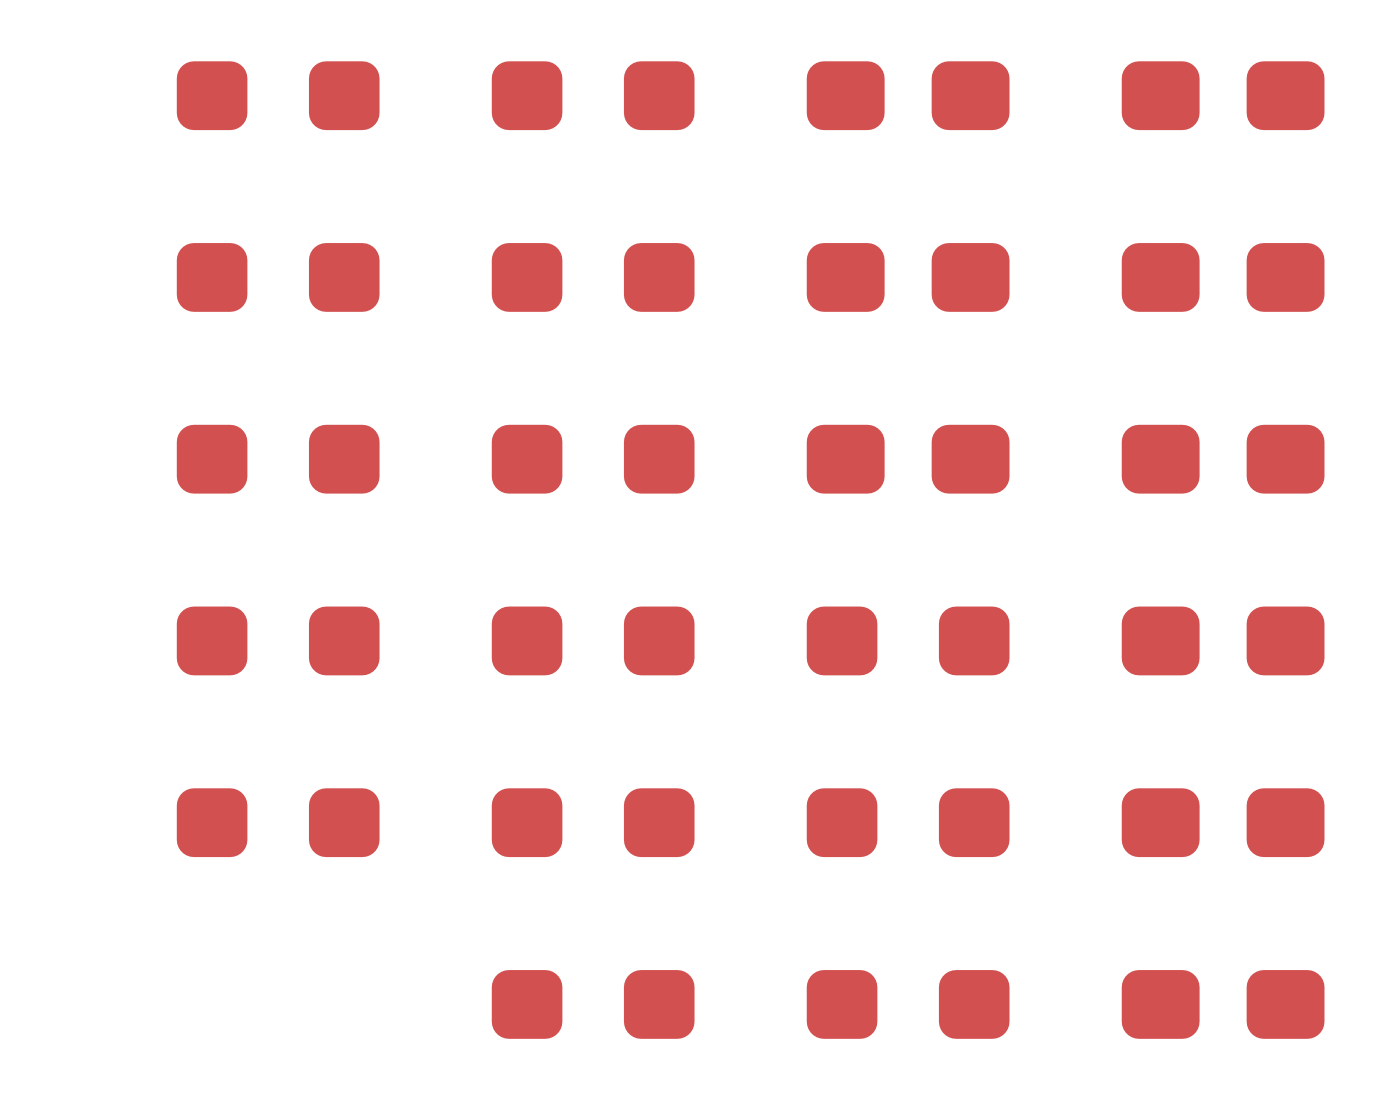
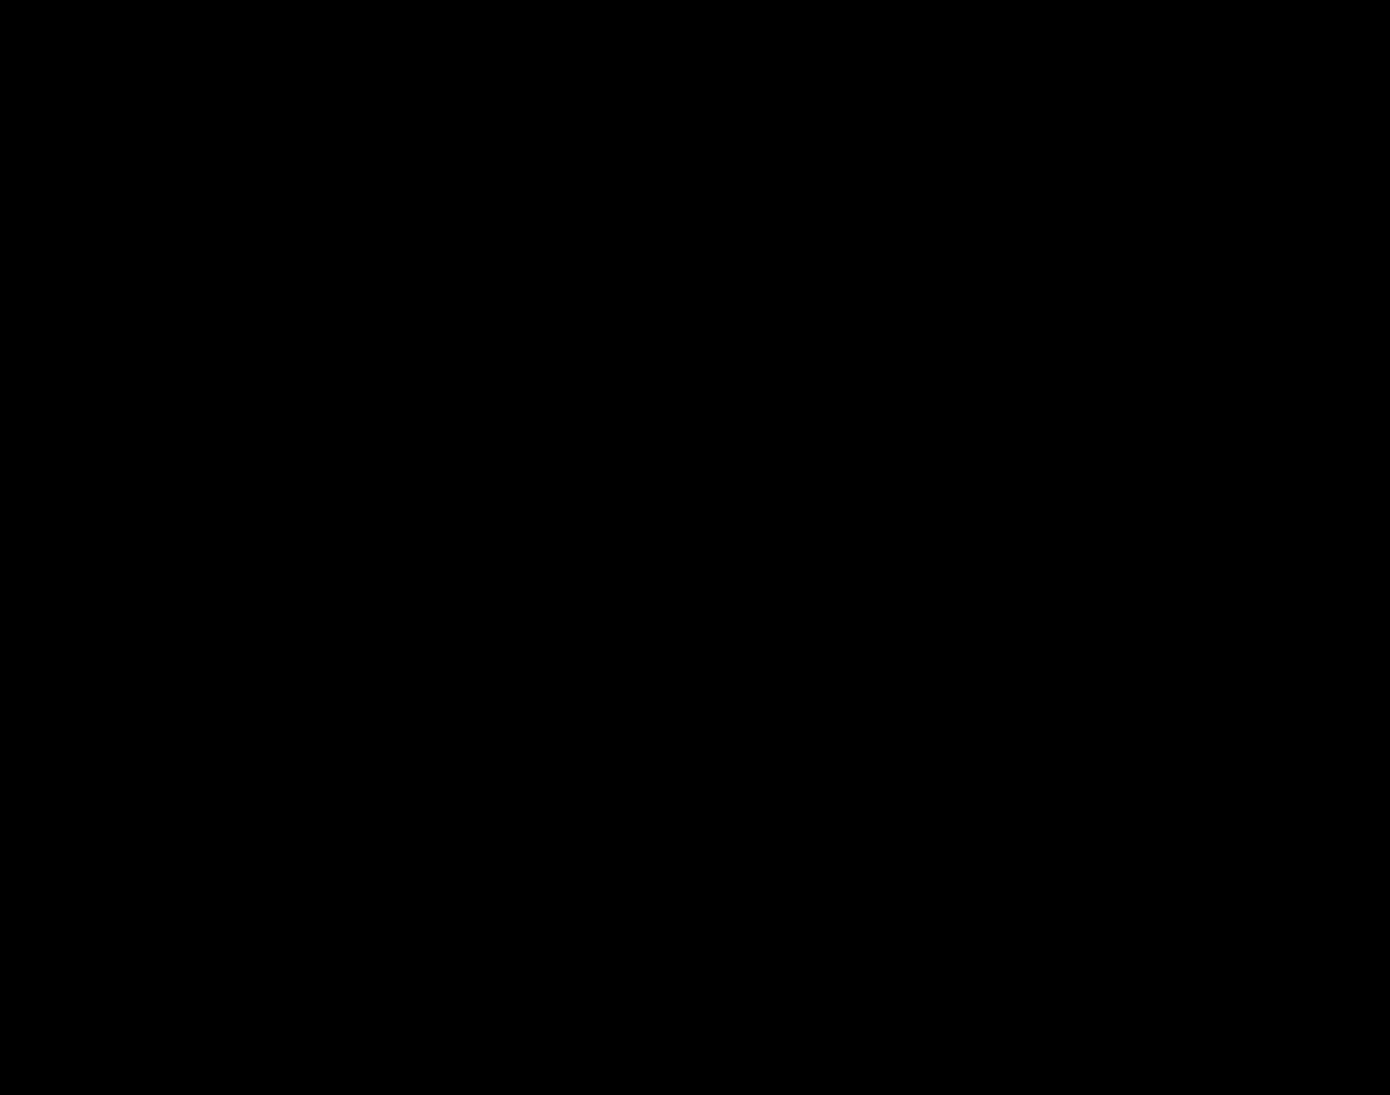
part: (278, 95) -> none
part: (593, 95) -> none
part: (908, 95) -> none
part: (1223, 95) -> none
part: (278, 277) -> none
part: (593, 277) -> none
part: (908, 277) -> none
part: (1223, 277) -> none
part: (278, 459) -> none
part: (593, 459) -> none
part: (908, 459) -> none
part: (1223, 459) -> none
part: (278, 640) -> none
part: (593, 640) -> none
part: (908, 640) -> none
part: (1223, 640) -> none
part: (278, 822) -> none
part: (593, 822) -> none
part: (908, 822) -> none
part: (1223, 822) -> none
part: (593, 1004) -> none
part: (908, 1004) -> none
part: (1223, 1004) -> none

